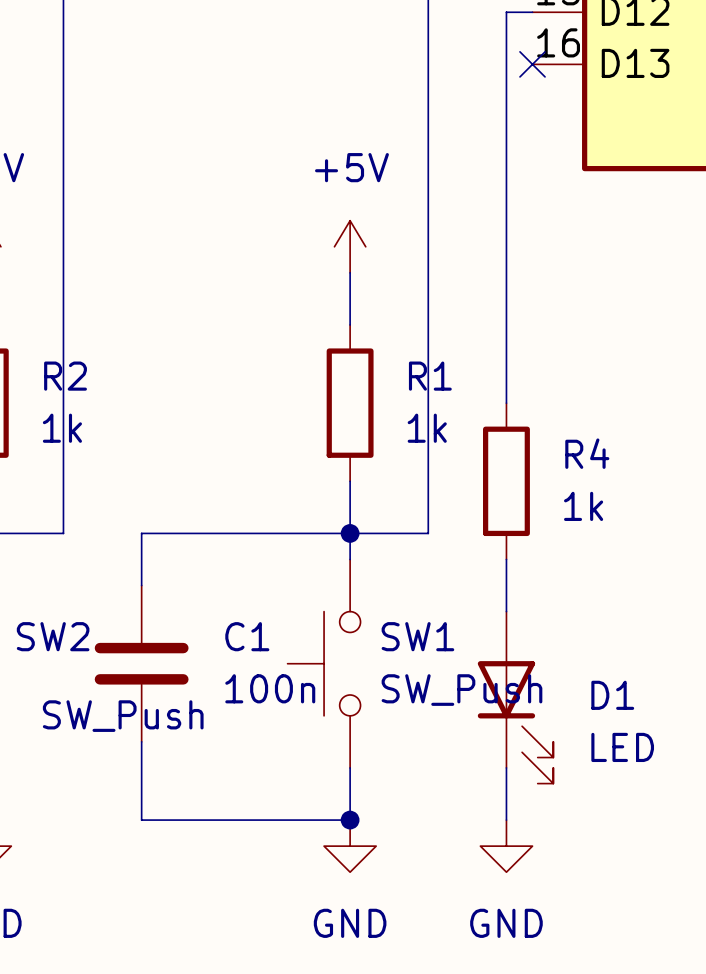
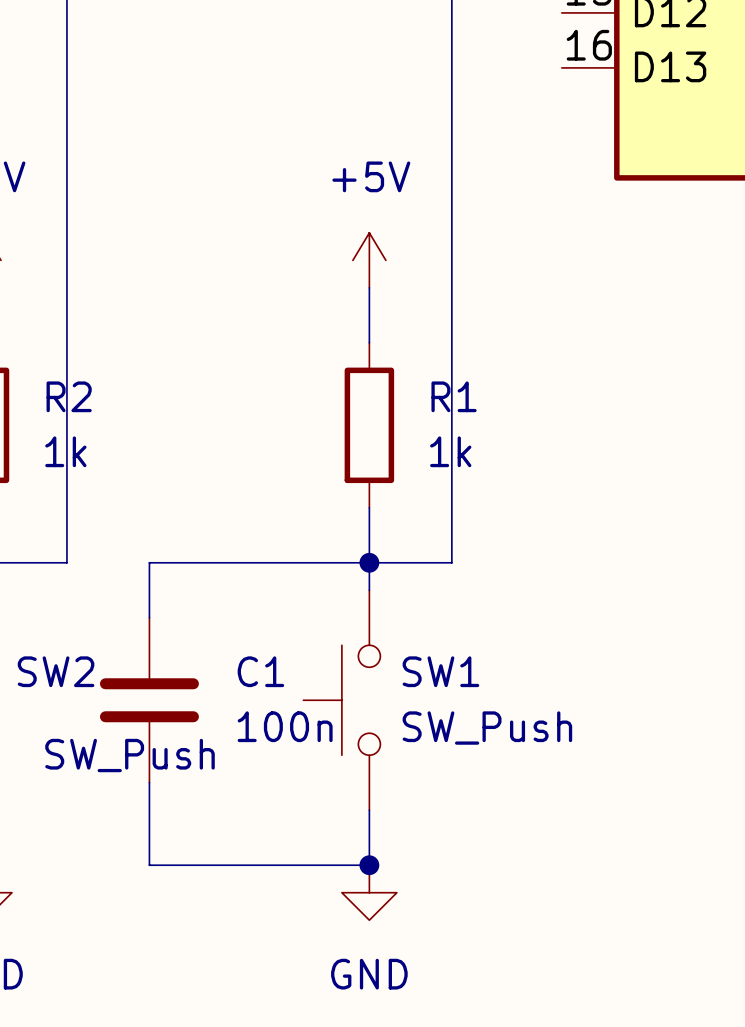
wire: (532, 12) (506, 12) (506, 403) -> none
no-connect mark: (532, 64) -> none
R4: 1k (506, 481) -> none
wire: (506, 559) (506, 611) -> none
D1: LED (515, 697) -> none
wire: (506, 767) (506, 820) -> none
power symbol: GND (506, 846) -> none

